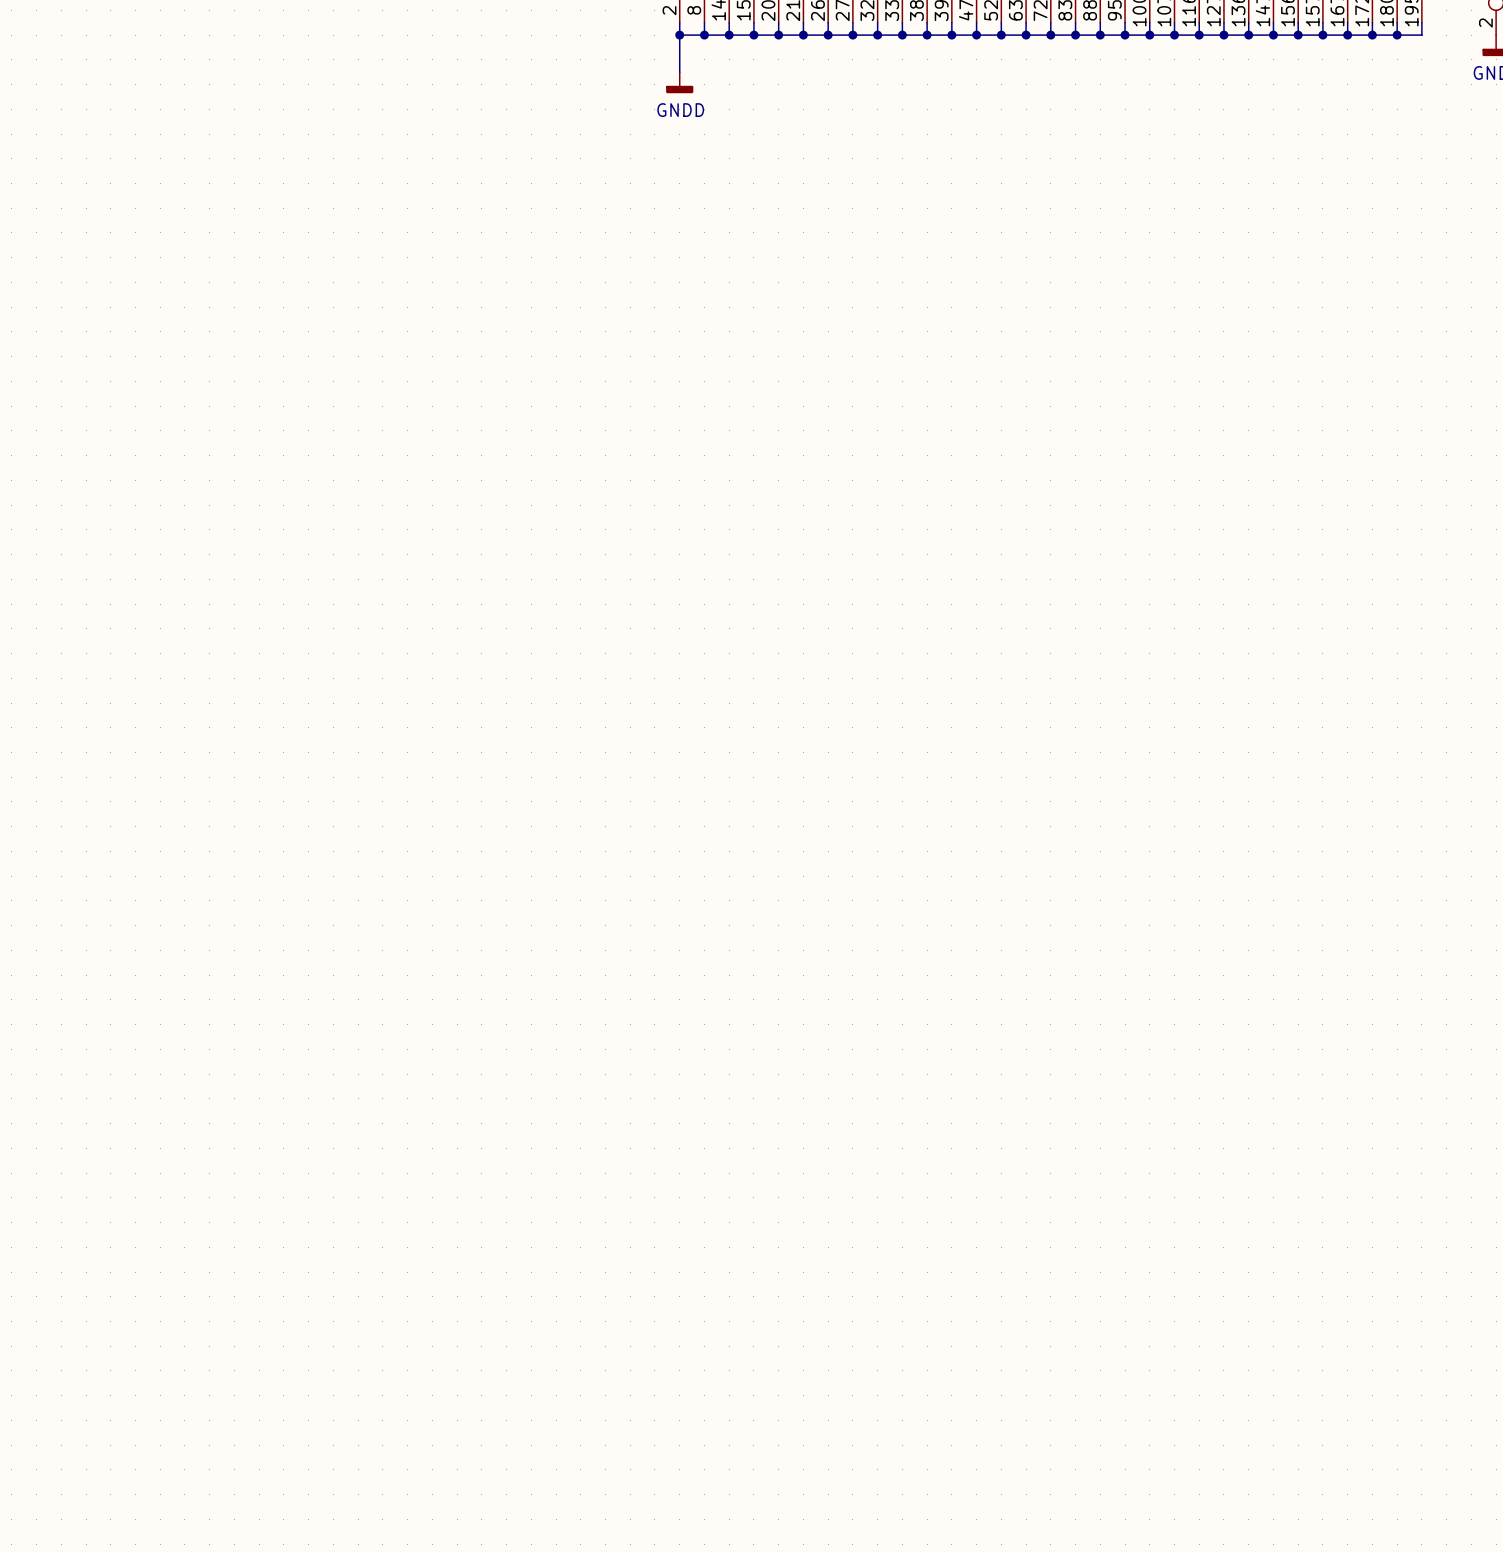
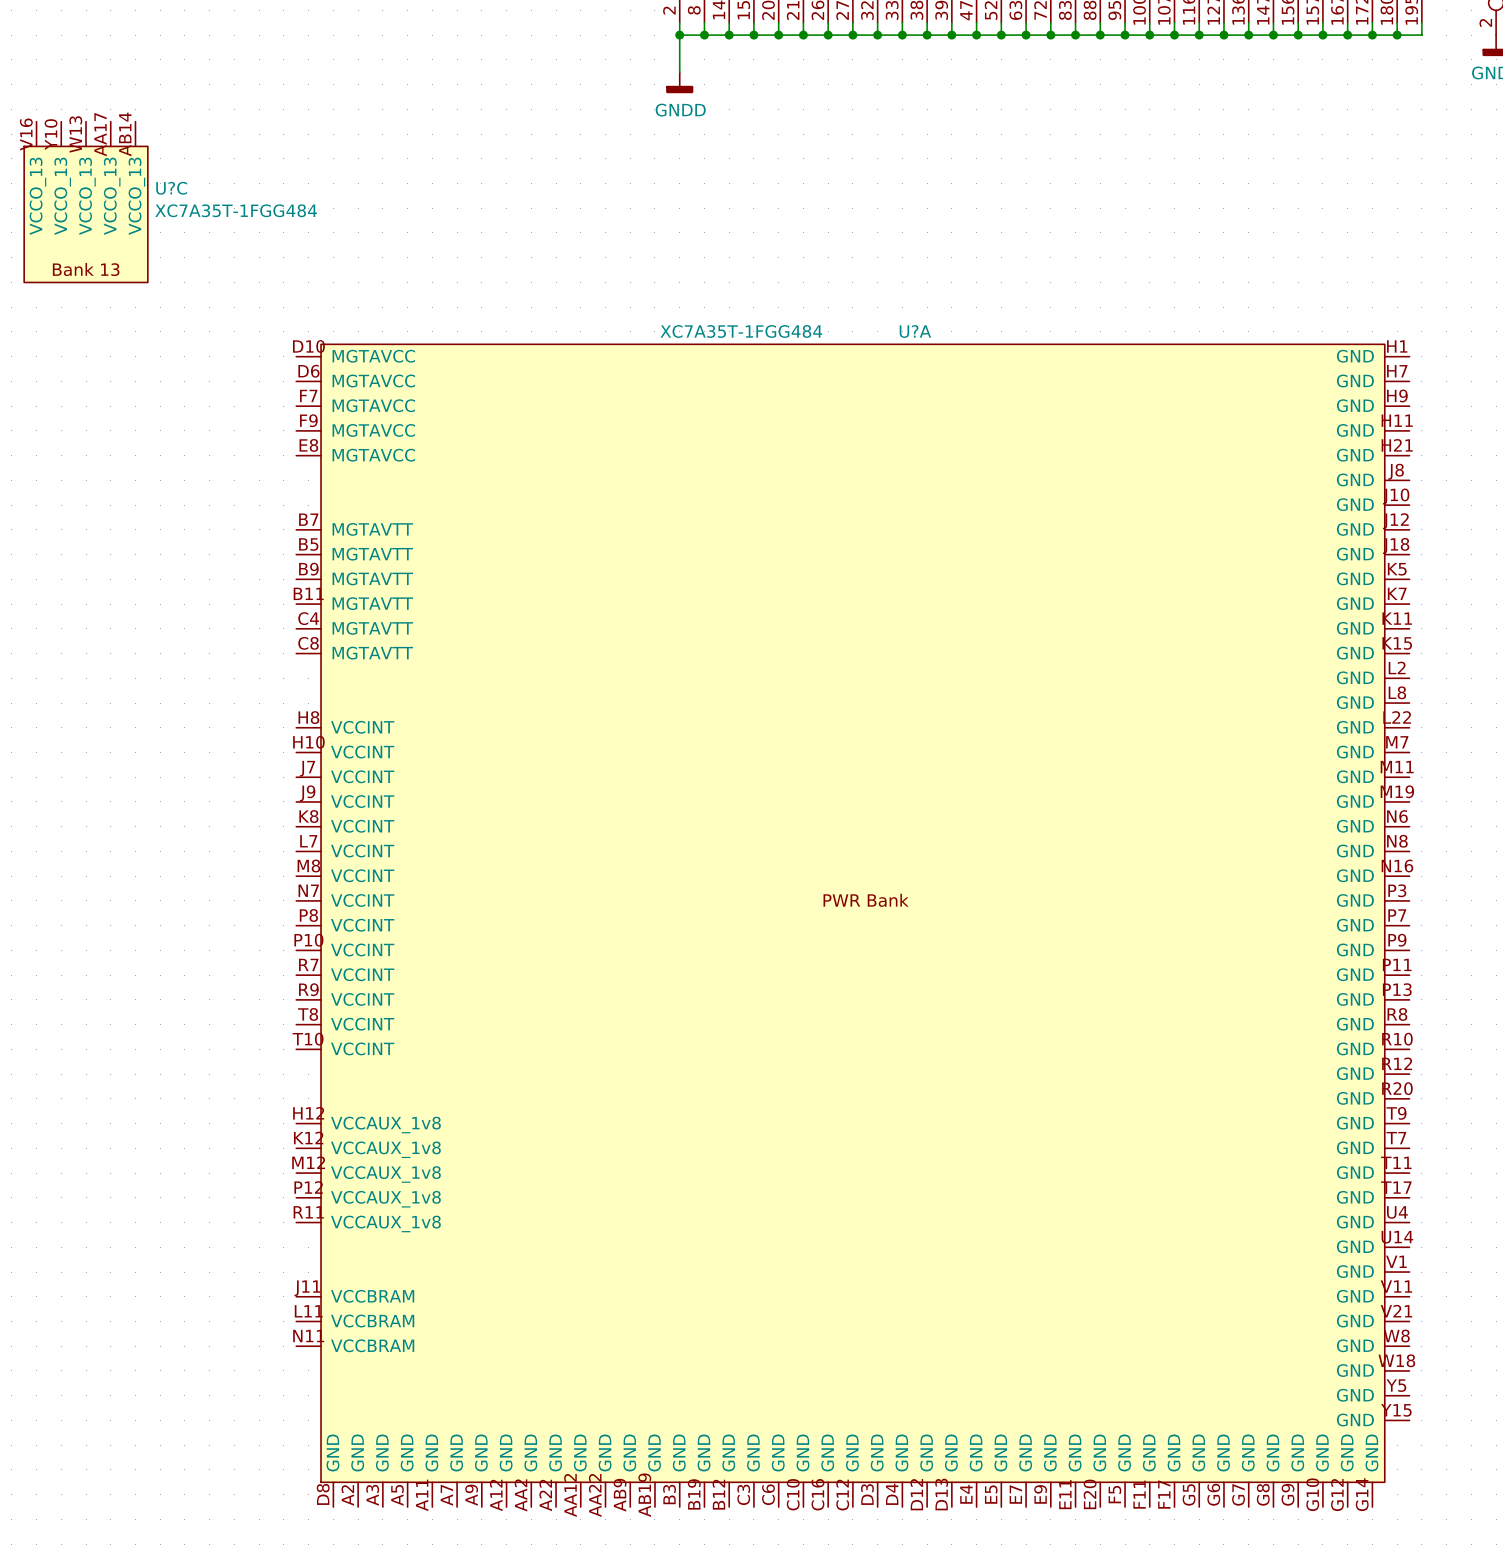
U?C: none -> XC7A35T-1FGG484 (86, 202)
U?A: none -> XC7A35T-1FGG484 (852, 925)

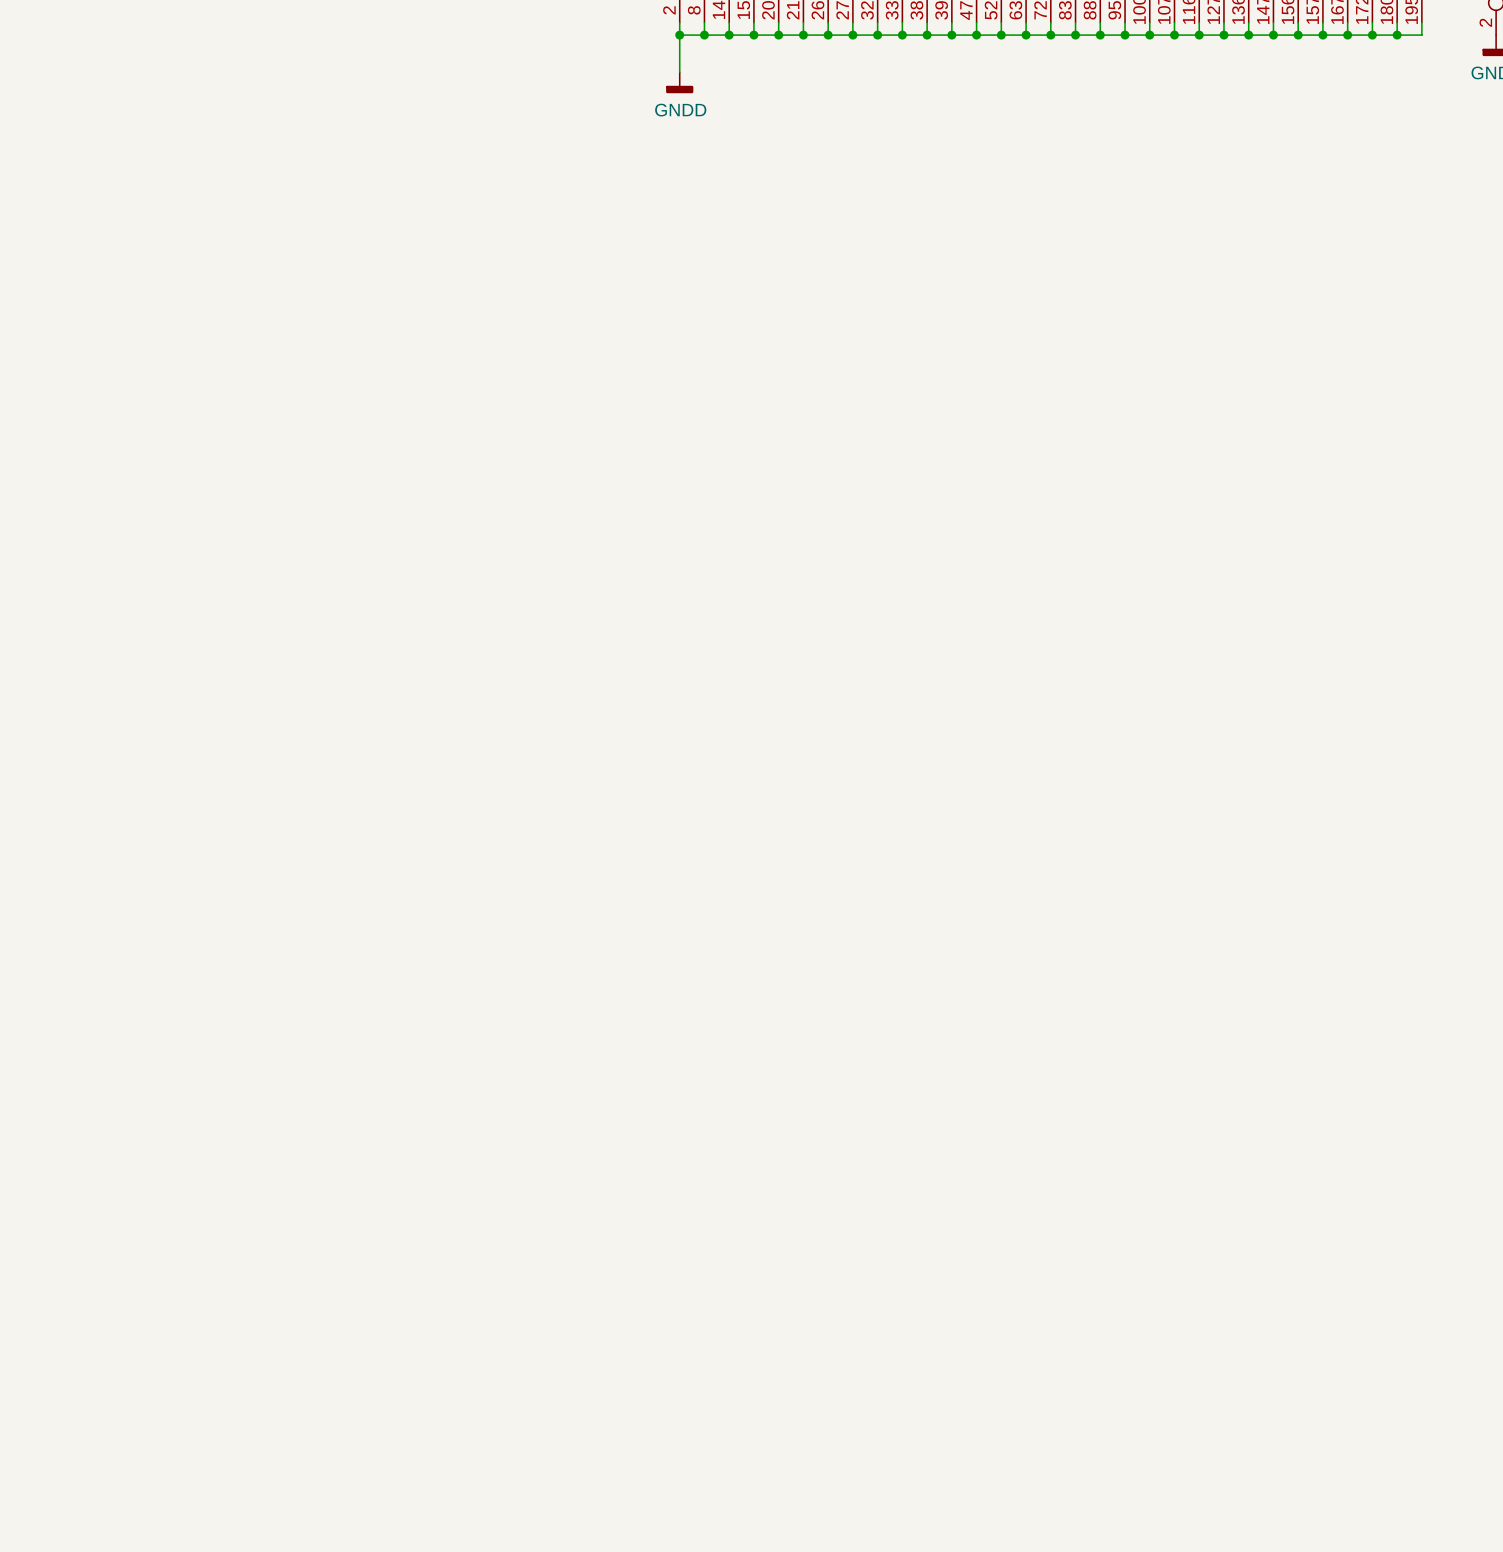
U?C: XC7A35T-1FGG484 (86, 202) -> none
U?A: XC7A35T-1FGG484 (852, 925) -> none

